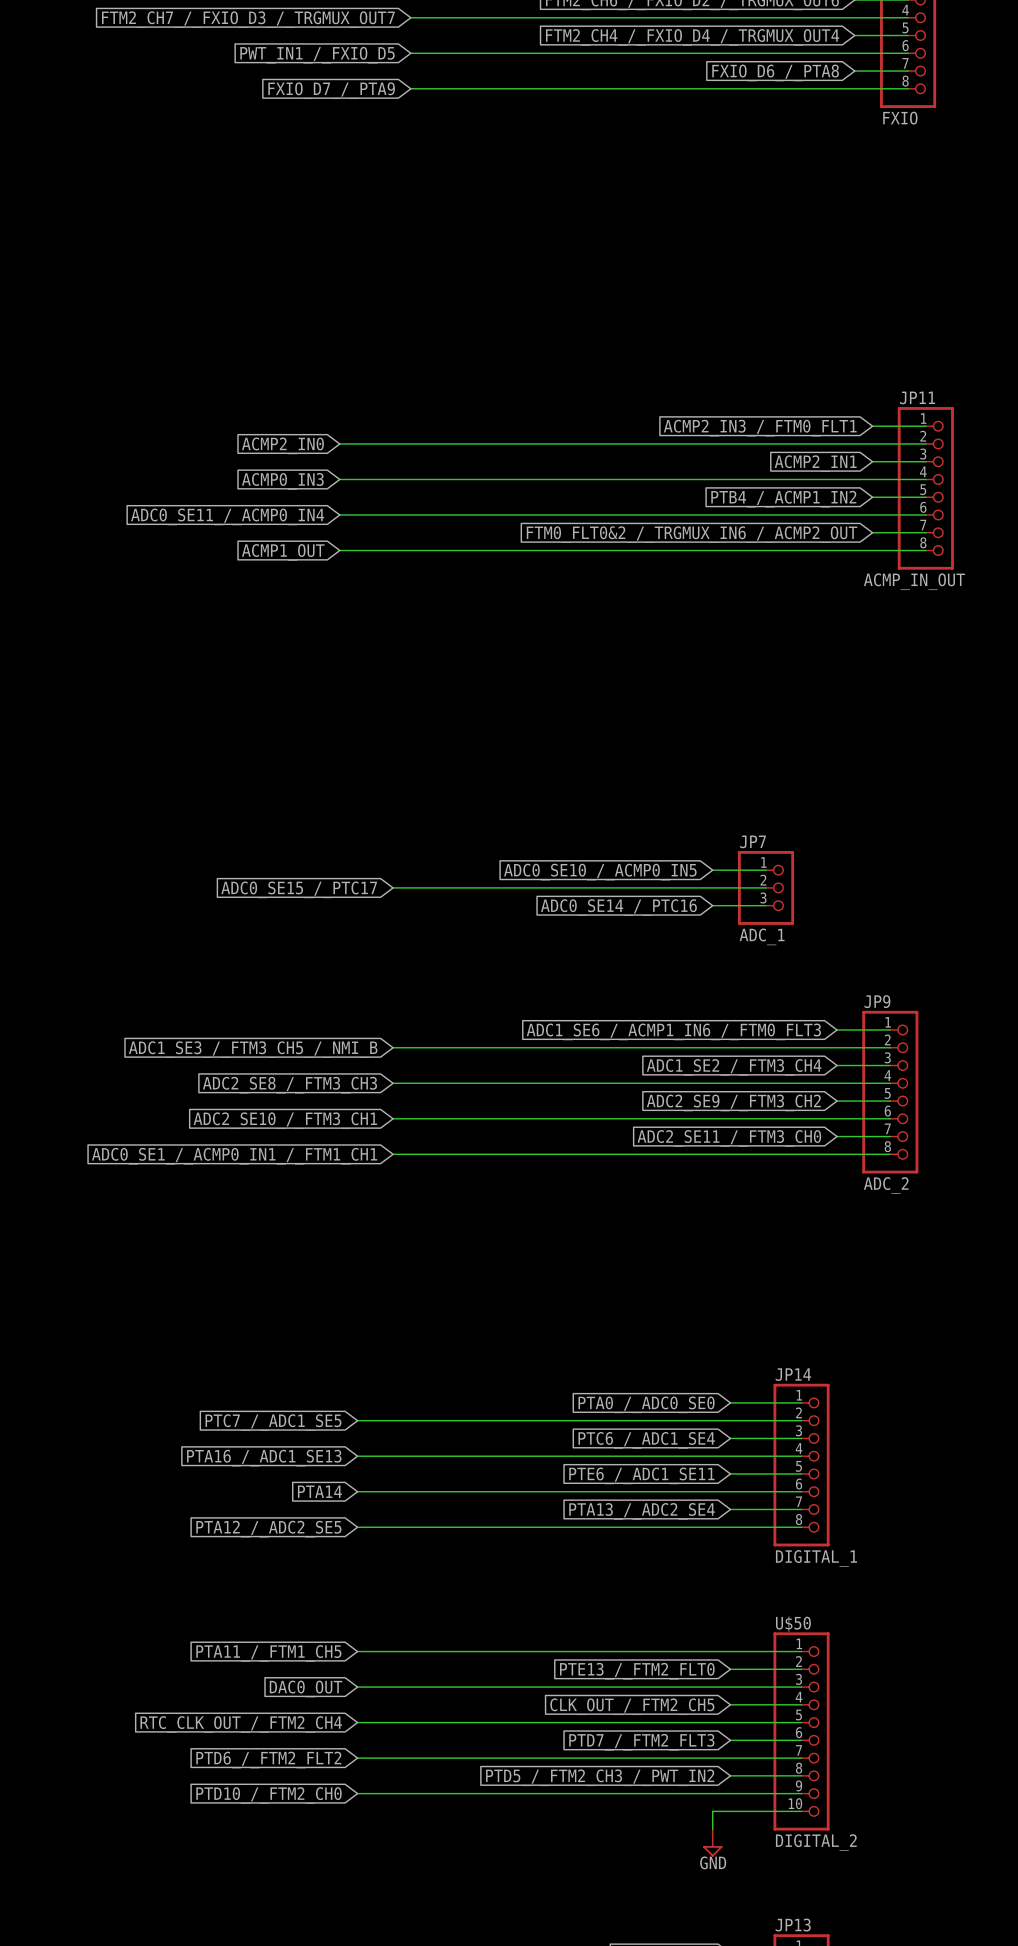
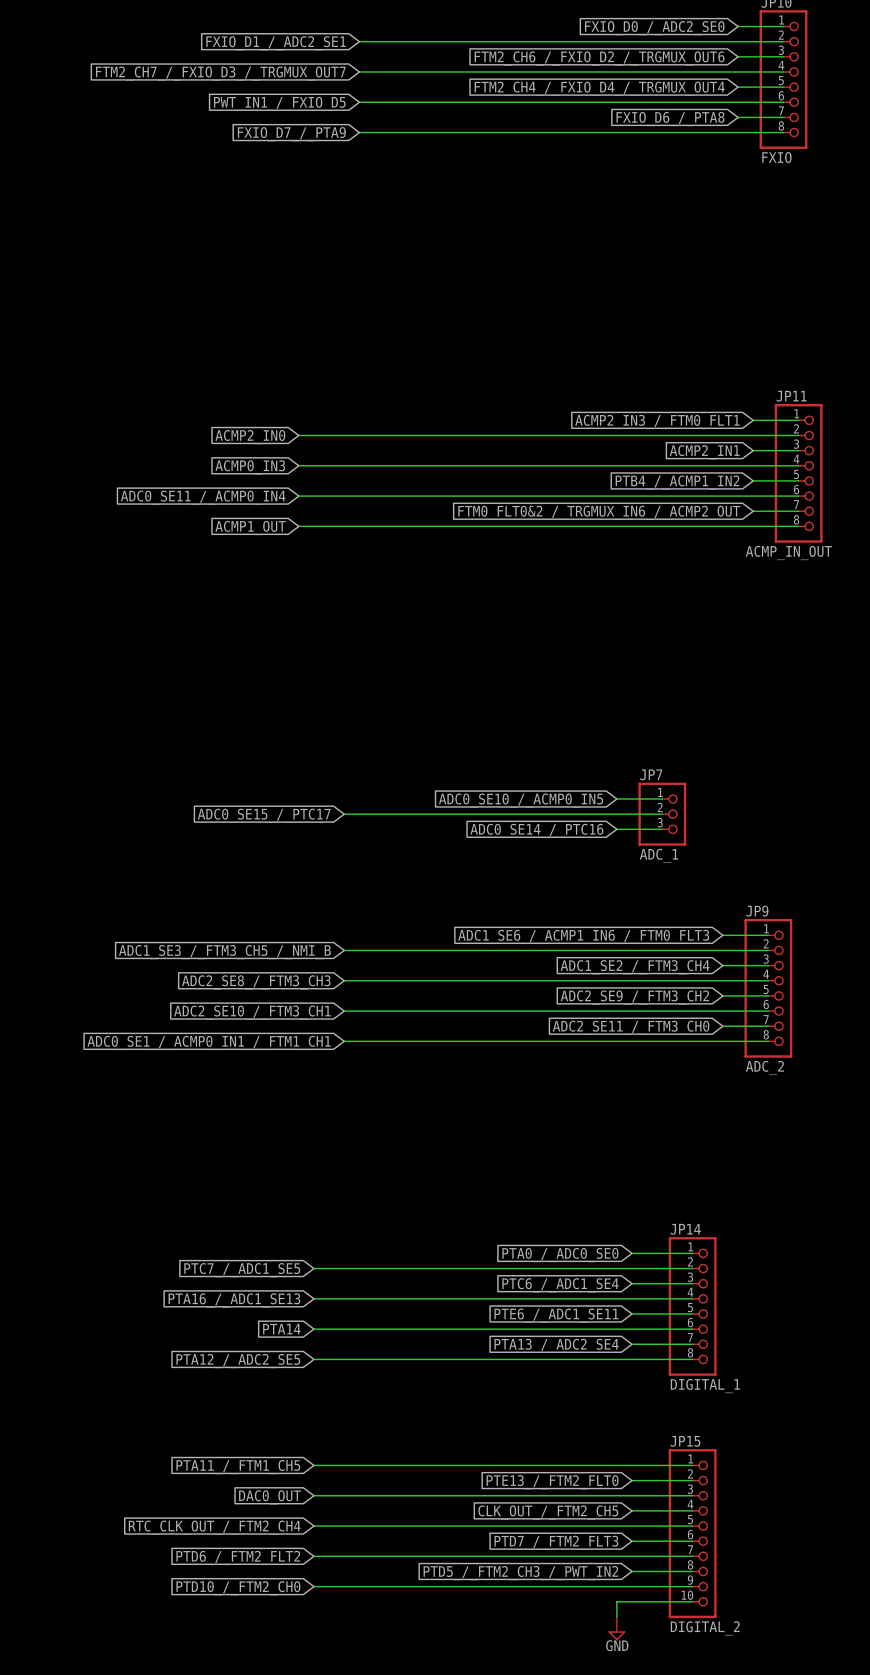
U$50 name: U$50 (793, 1624) -> JP15 (685, 1441)

